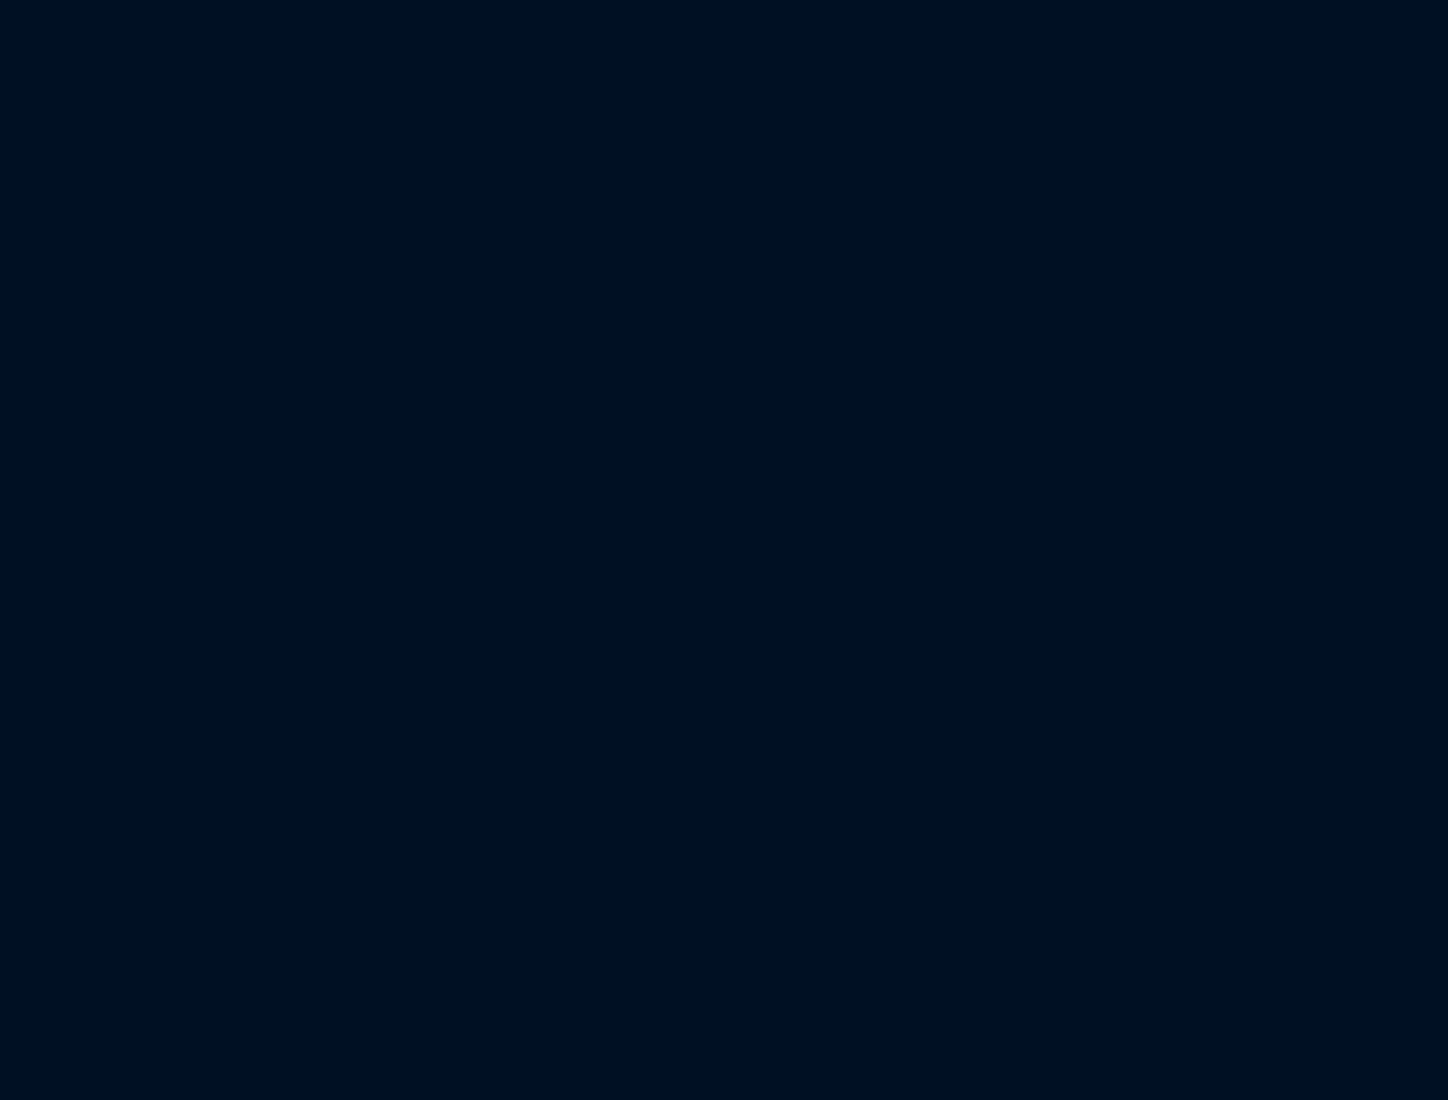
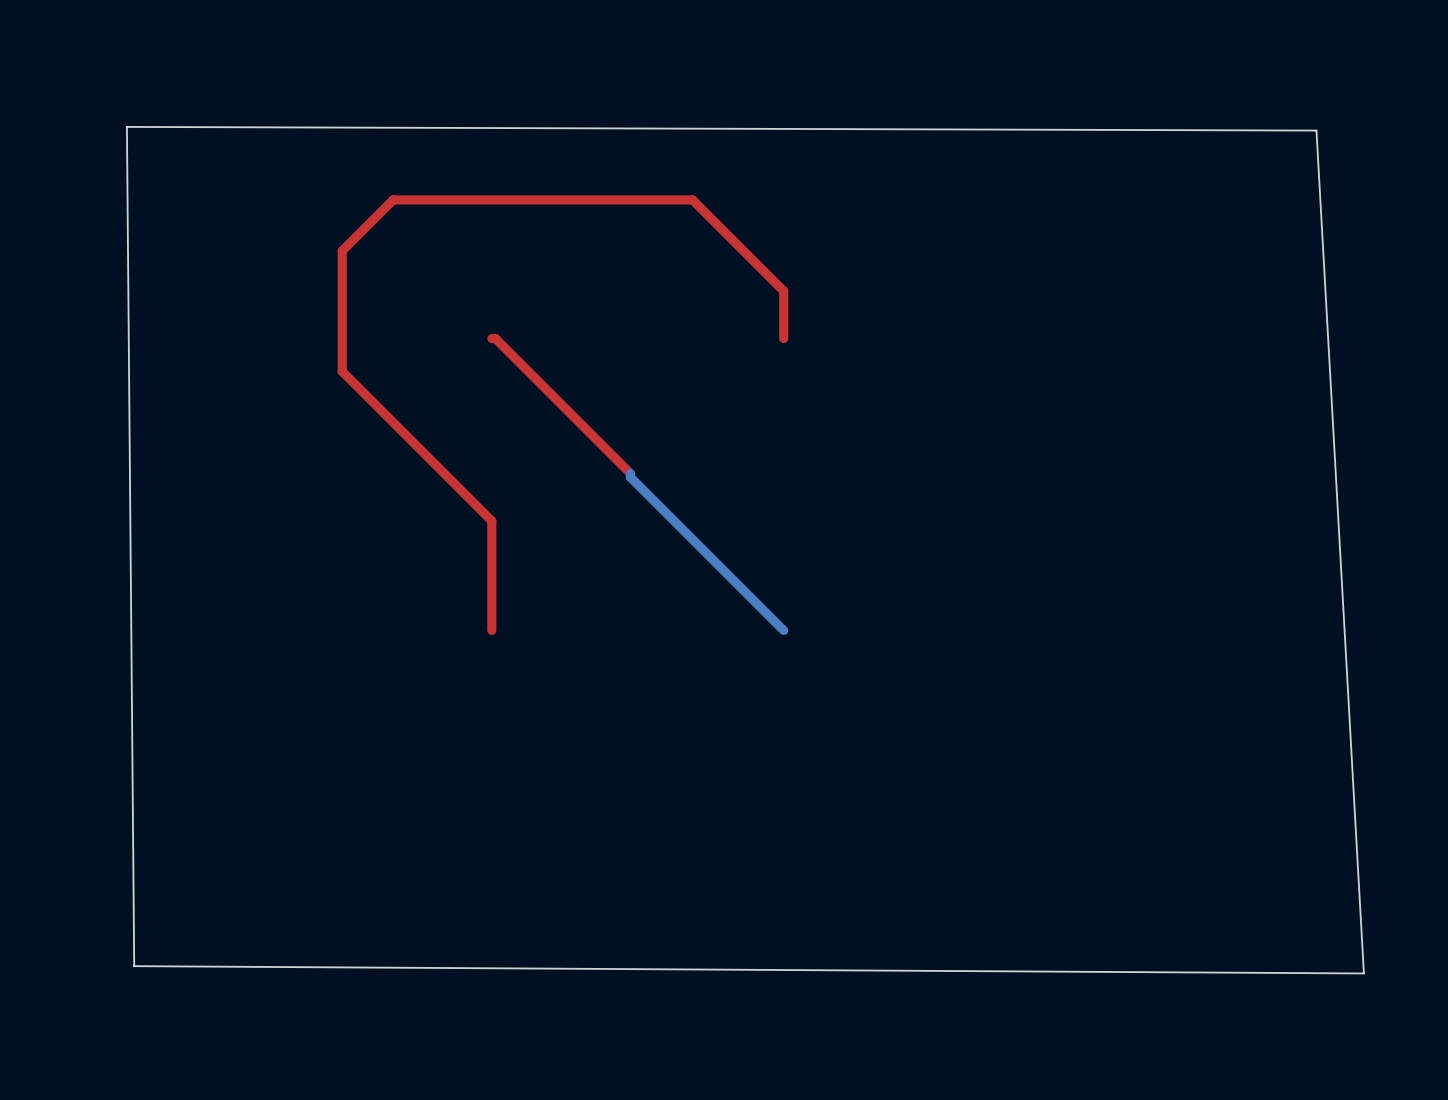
board edge: none -> (126, 126) (134, 966) (1363, 973) (1316, 130) (126, 126)
top track: none -> (491, 338) (495, 338) (630, 473)
top track: none -> (783, 338) (783, 291) (692, 199) (393, 199) (342, 250) (342, 371) (491, 521) (491, 630)
bottom track: none -> (630, 473) (630, 477) (783, 630)

